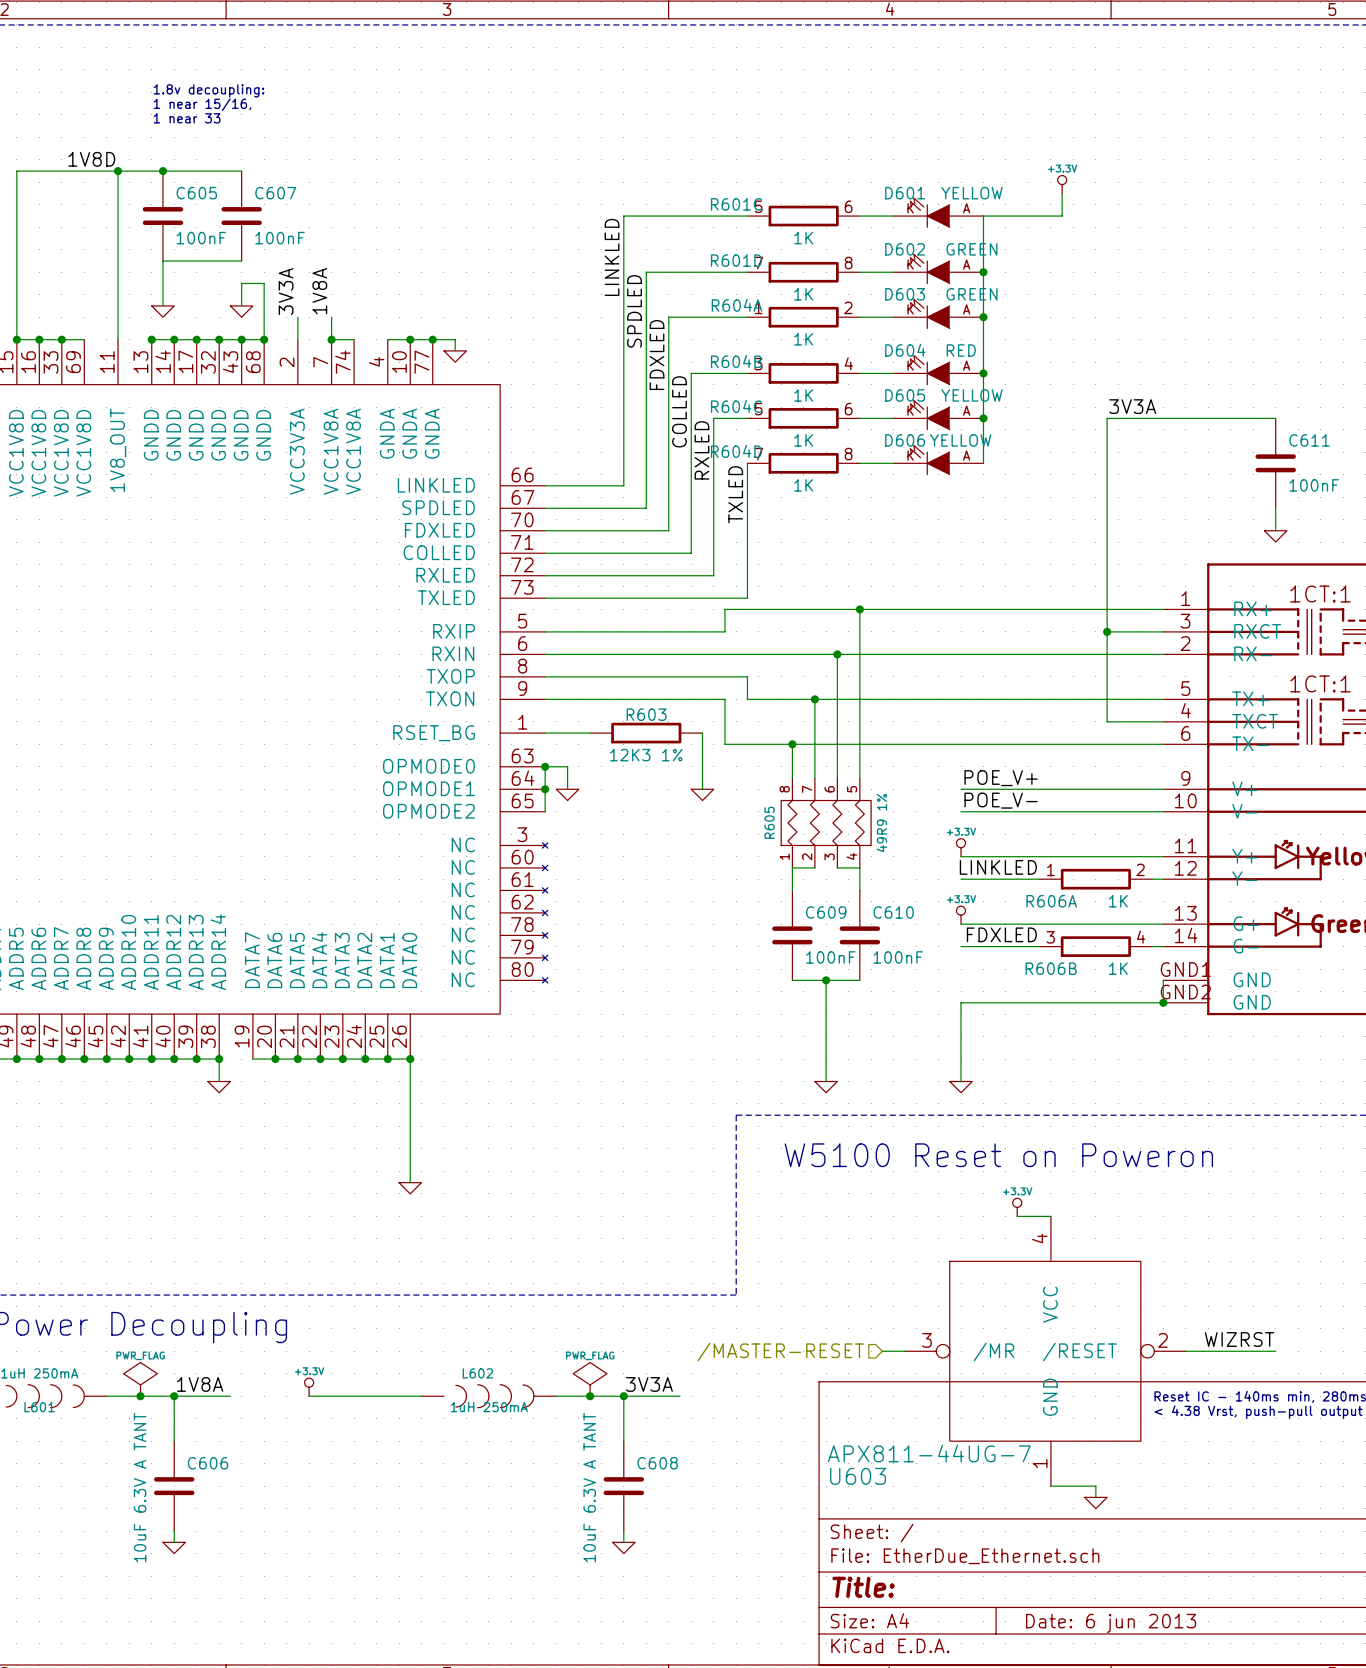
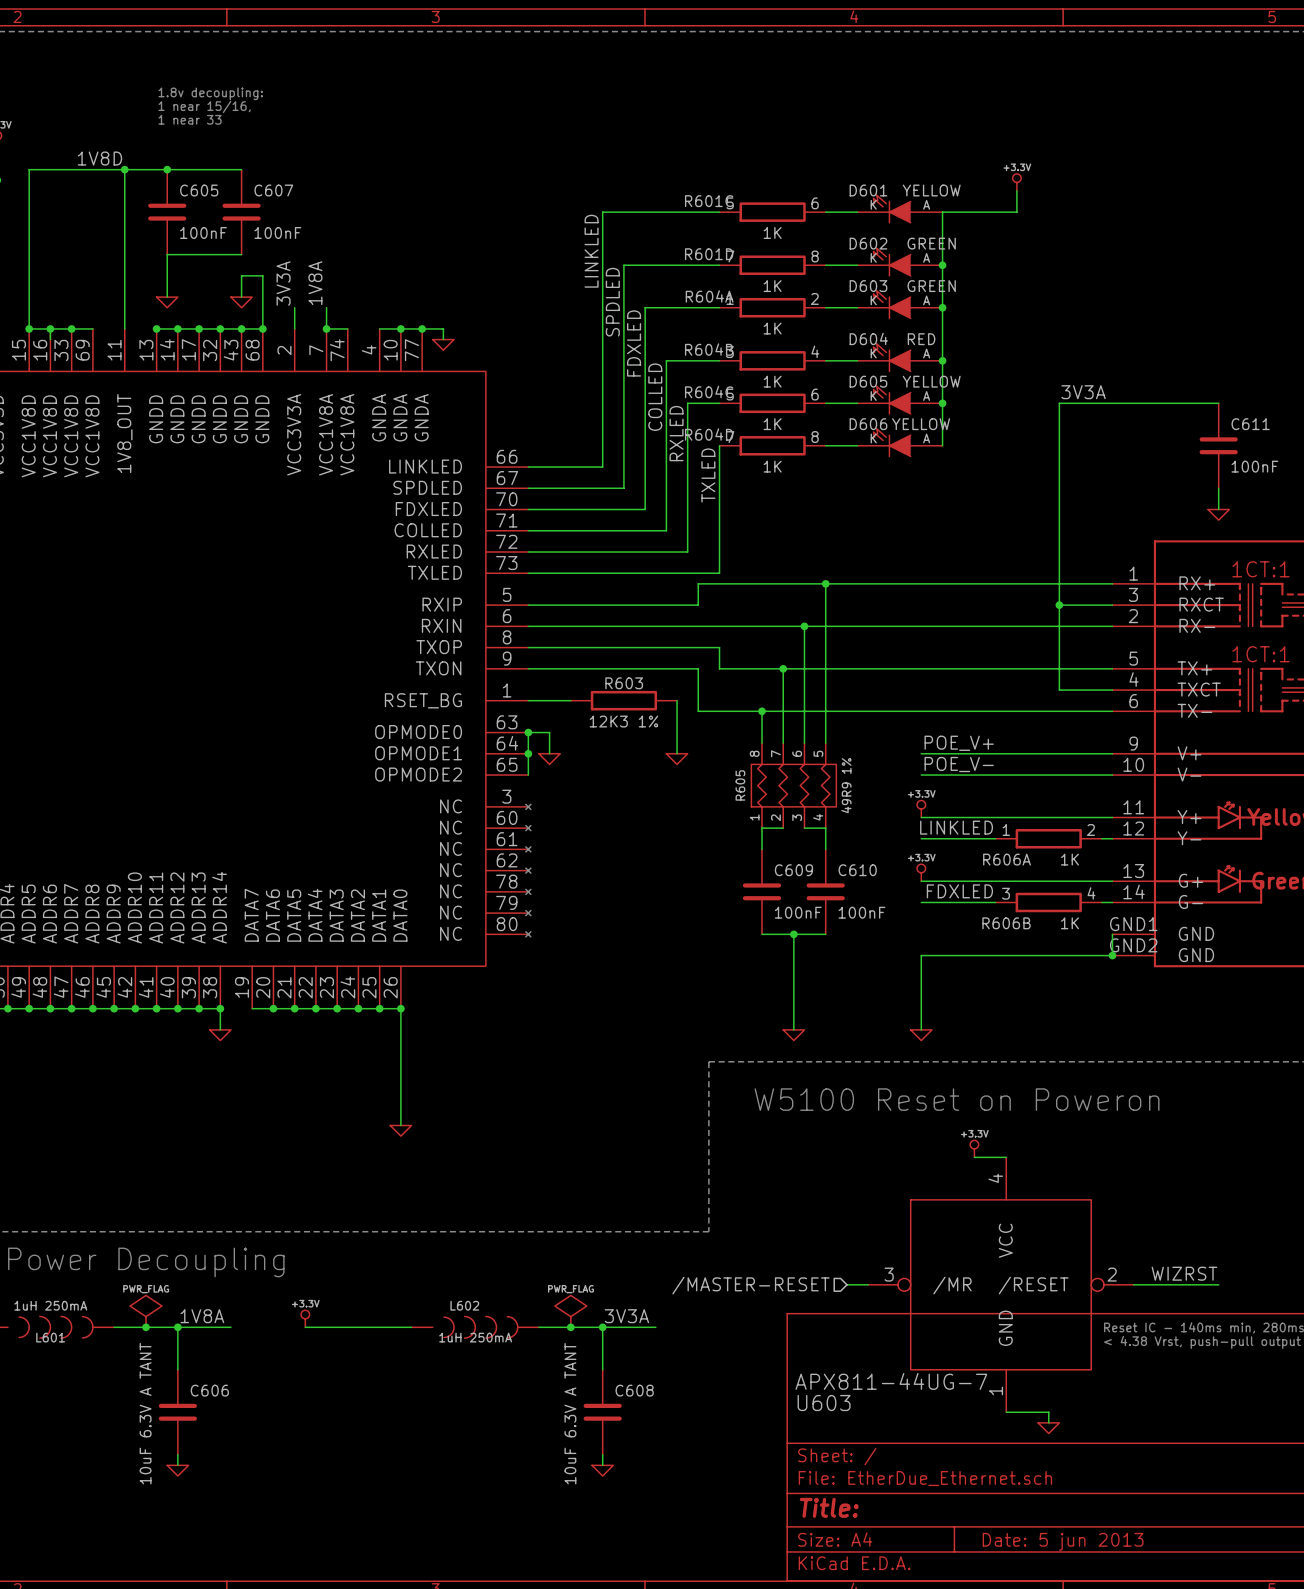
title block: Date: 6 jun 2013 (1111, 1623) -> Date: 5 jun 2013 (1063, 1541)

